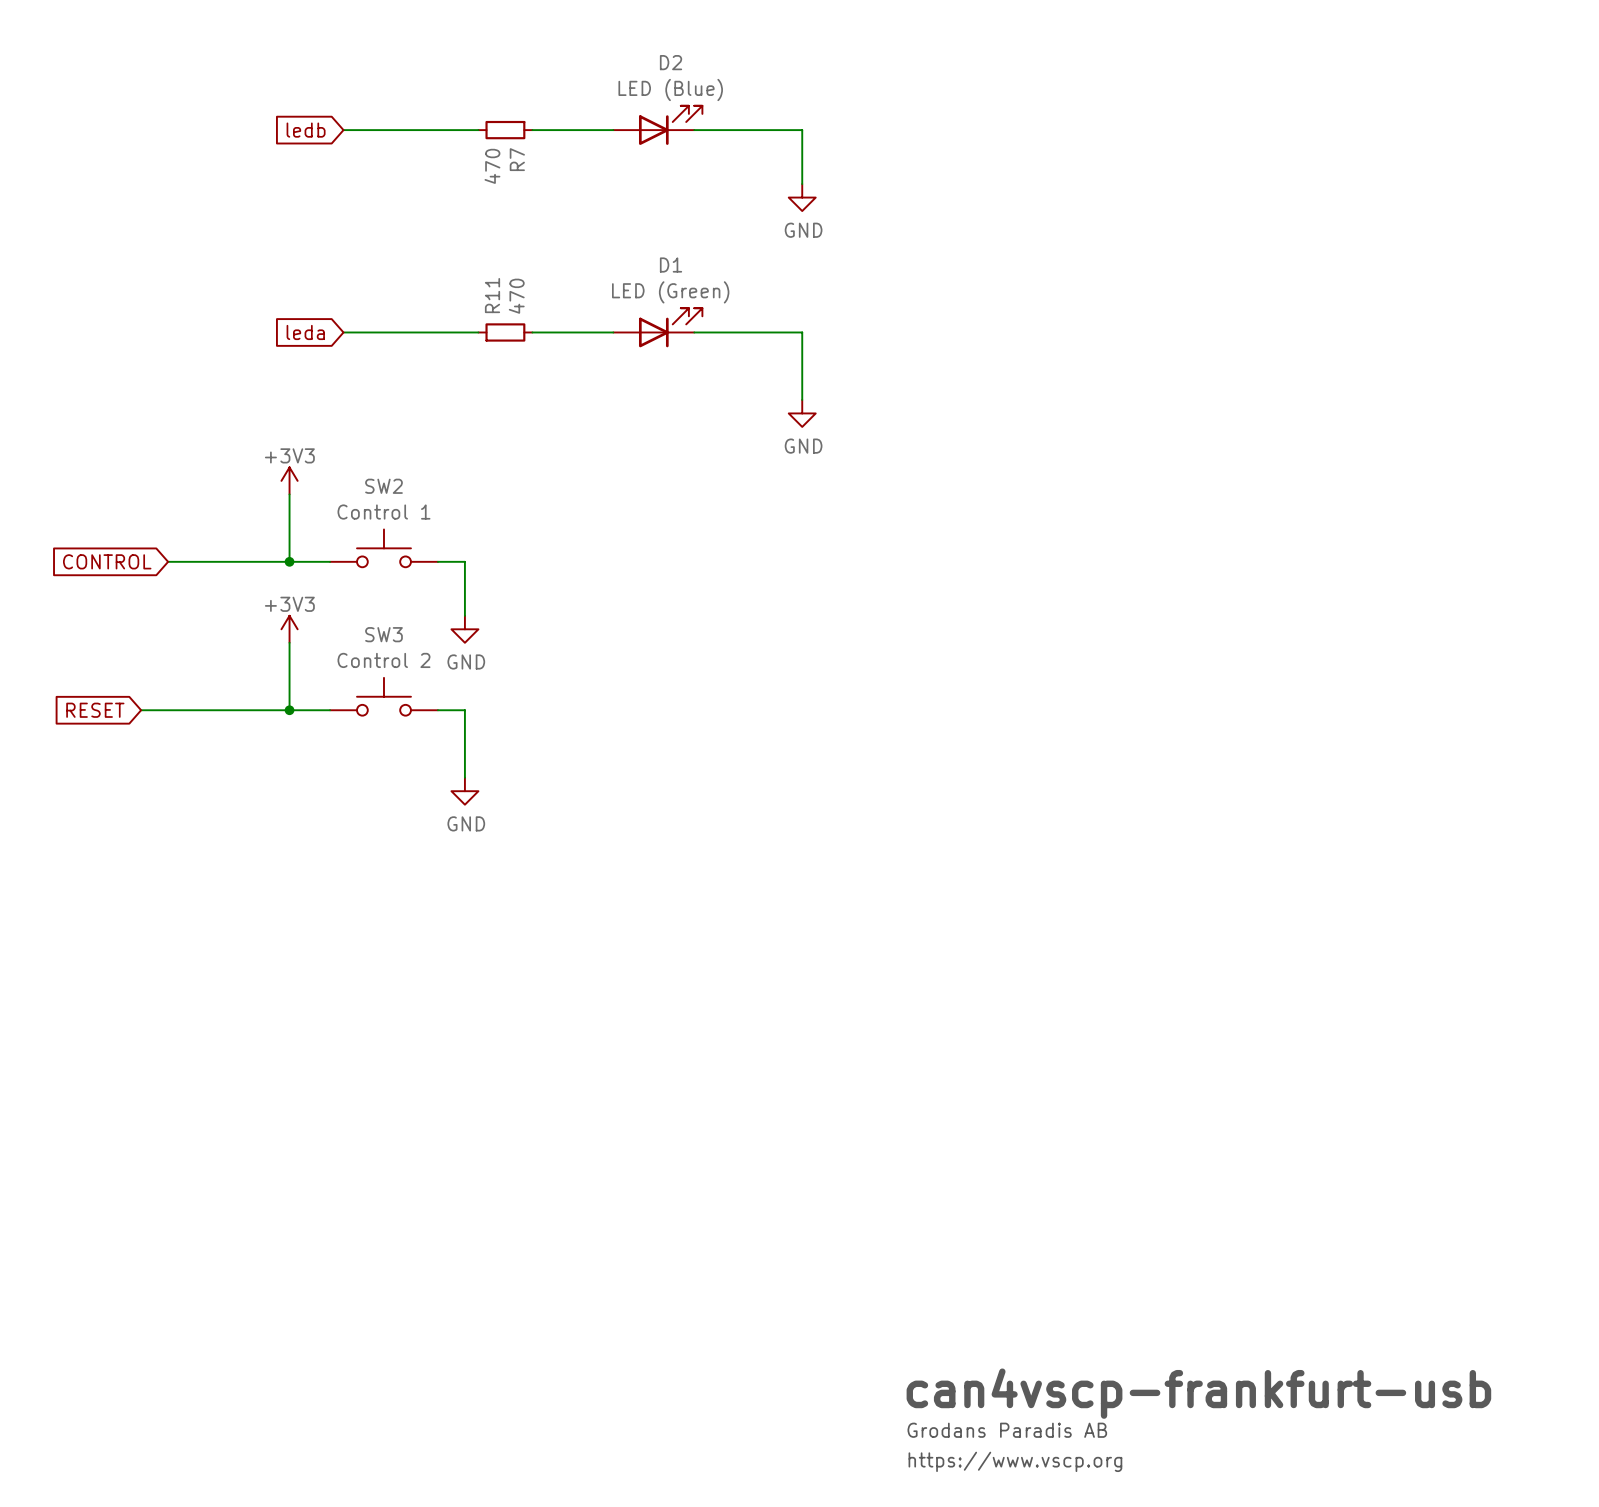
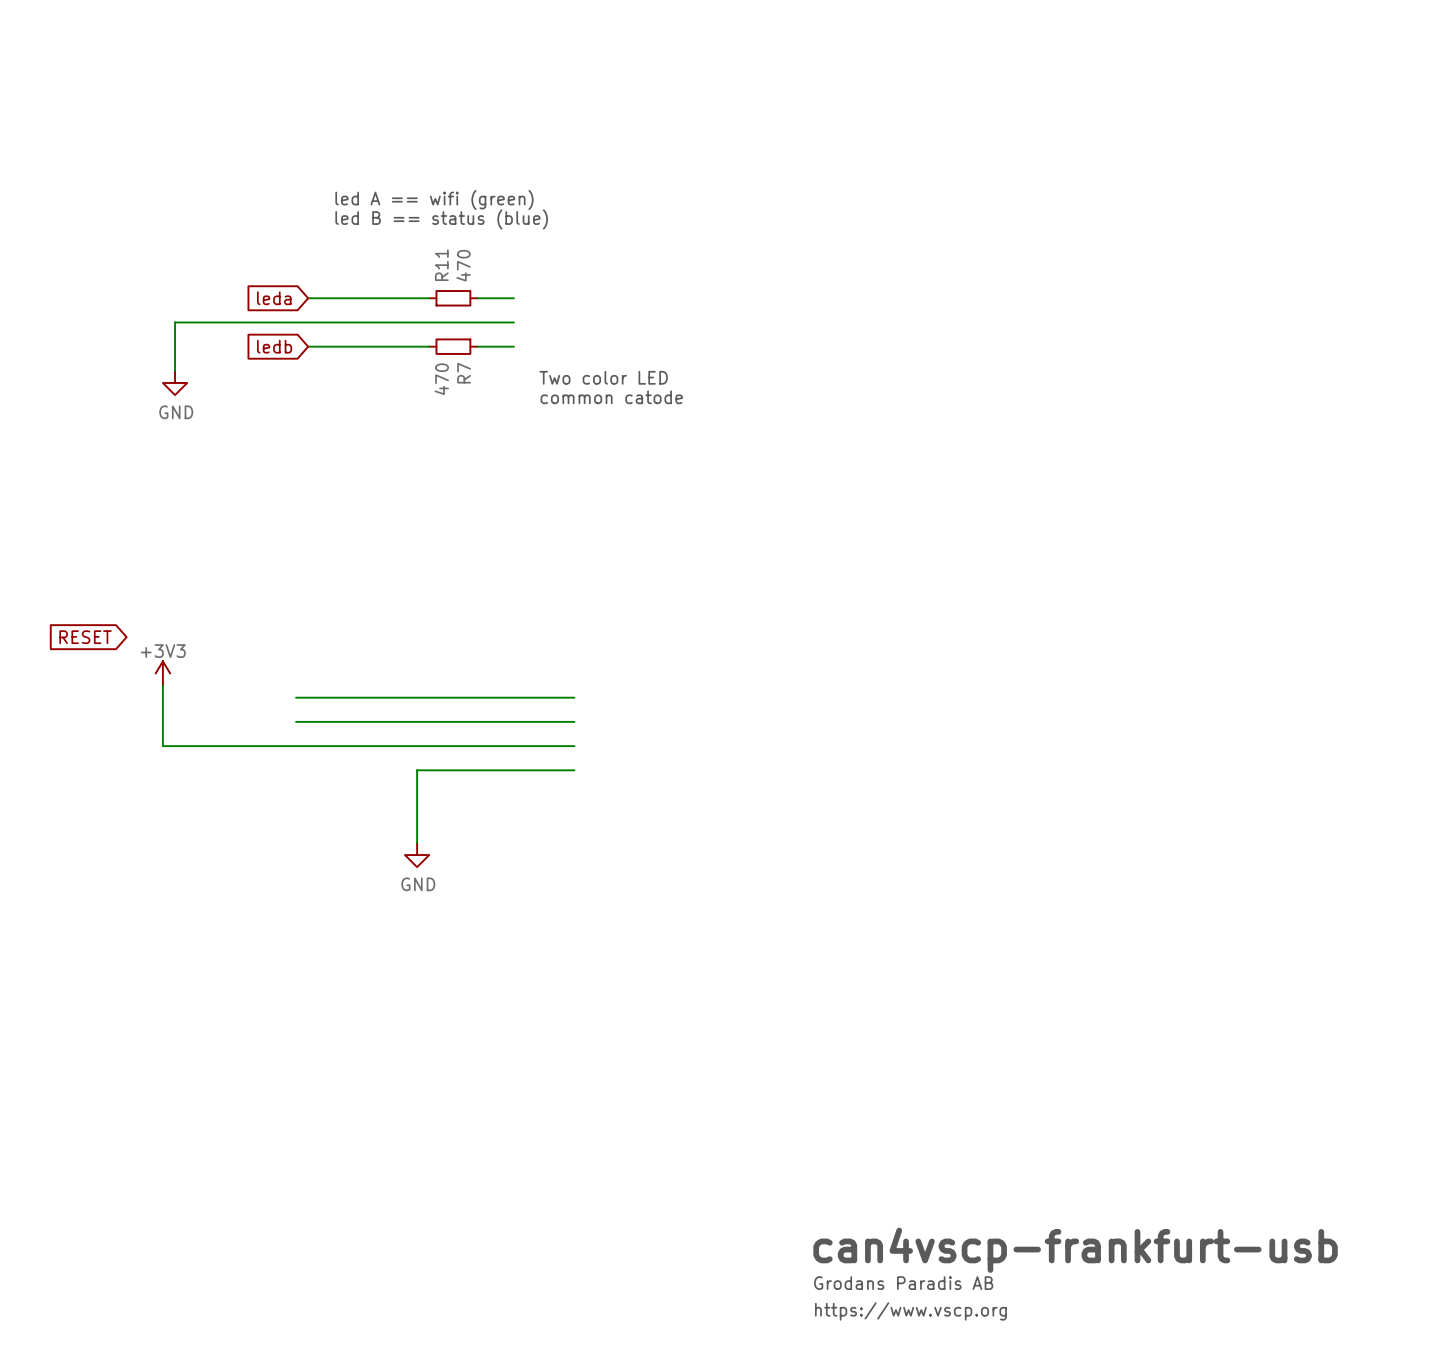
D2: LED (Blue) (657, 125) -> none
global label position: ledb (306, 130) -> ledb (274, 346)
wire: (343, 130) (478, 130) -> (308, 346) (429, 346)
R7 position: (505, 130) -> (453, 346)
wire: (532, 130) (613, 130) -> none
wire: (694, 130) (802, 130) (802, 184) -> none
power symbol: GND (802, 197) -> none
text: none -> led A == wifi (green) (434, 199)
text: none -> led B == status (blue) (441, 219)
D1: LED (Green) (657, 327) -> none
wire: (572, 332) (613, 332) -> (477, 346) (513, 346)
wire: (694, 332) (802, 332) (802, 399) -> none
wire: none -> (513, 322) (175, 322) (175, 370)
power symbol: GND (802, 413) -> none
text: none -> Two color LED (603, 377)
power symbol: none -> GND (175, 382)
text: none -> common catode (611, 397)
power symbol: +3V3 (289, 480) -> none
wire: (289, 494) (289, 561) -> none
SW2: Control 1 (383, 548) -> none
global label: CONTROL (107, 561) -> none
wire: (168, 561) (330, 561) -> none
junction: (289, 561) -> none
wire: (437, 561) (464, 561) (464, 615) -> none
power symbol: +3V3 (289, 629) -> none
power symbol: GND (464, 629) -> none
wire: (289, 642) (289, 710) -> none
SW3: Control 2 (383, 696) -> none
wire: (141, 710) (330, 710) -> none
junction: (289, 710) -> none
wire: (437, 710) (464, 710) (464, 777) -> none
power symbol: none -> +3V3 (162, 673)
wire: none -> (162, 685) (162, 746) (574, 746)
wire: none -> (296, 697) (574, 697)
power symbol: GND (464, 791) -> none
wire: none -> (296, 721) (574, 721)
wire: none -> (574, 770) (417, 770) (417, 842)
power symbol: none -> GND (417, 855)

